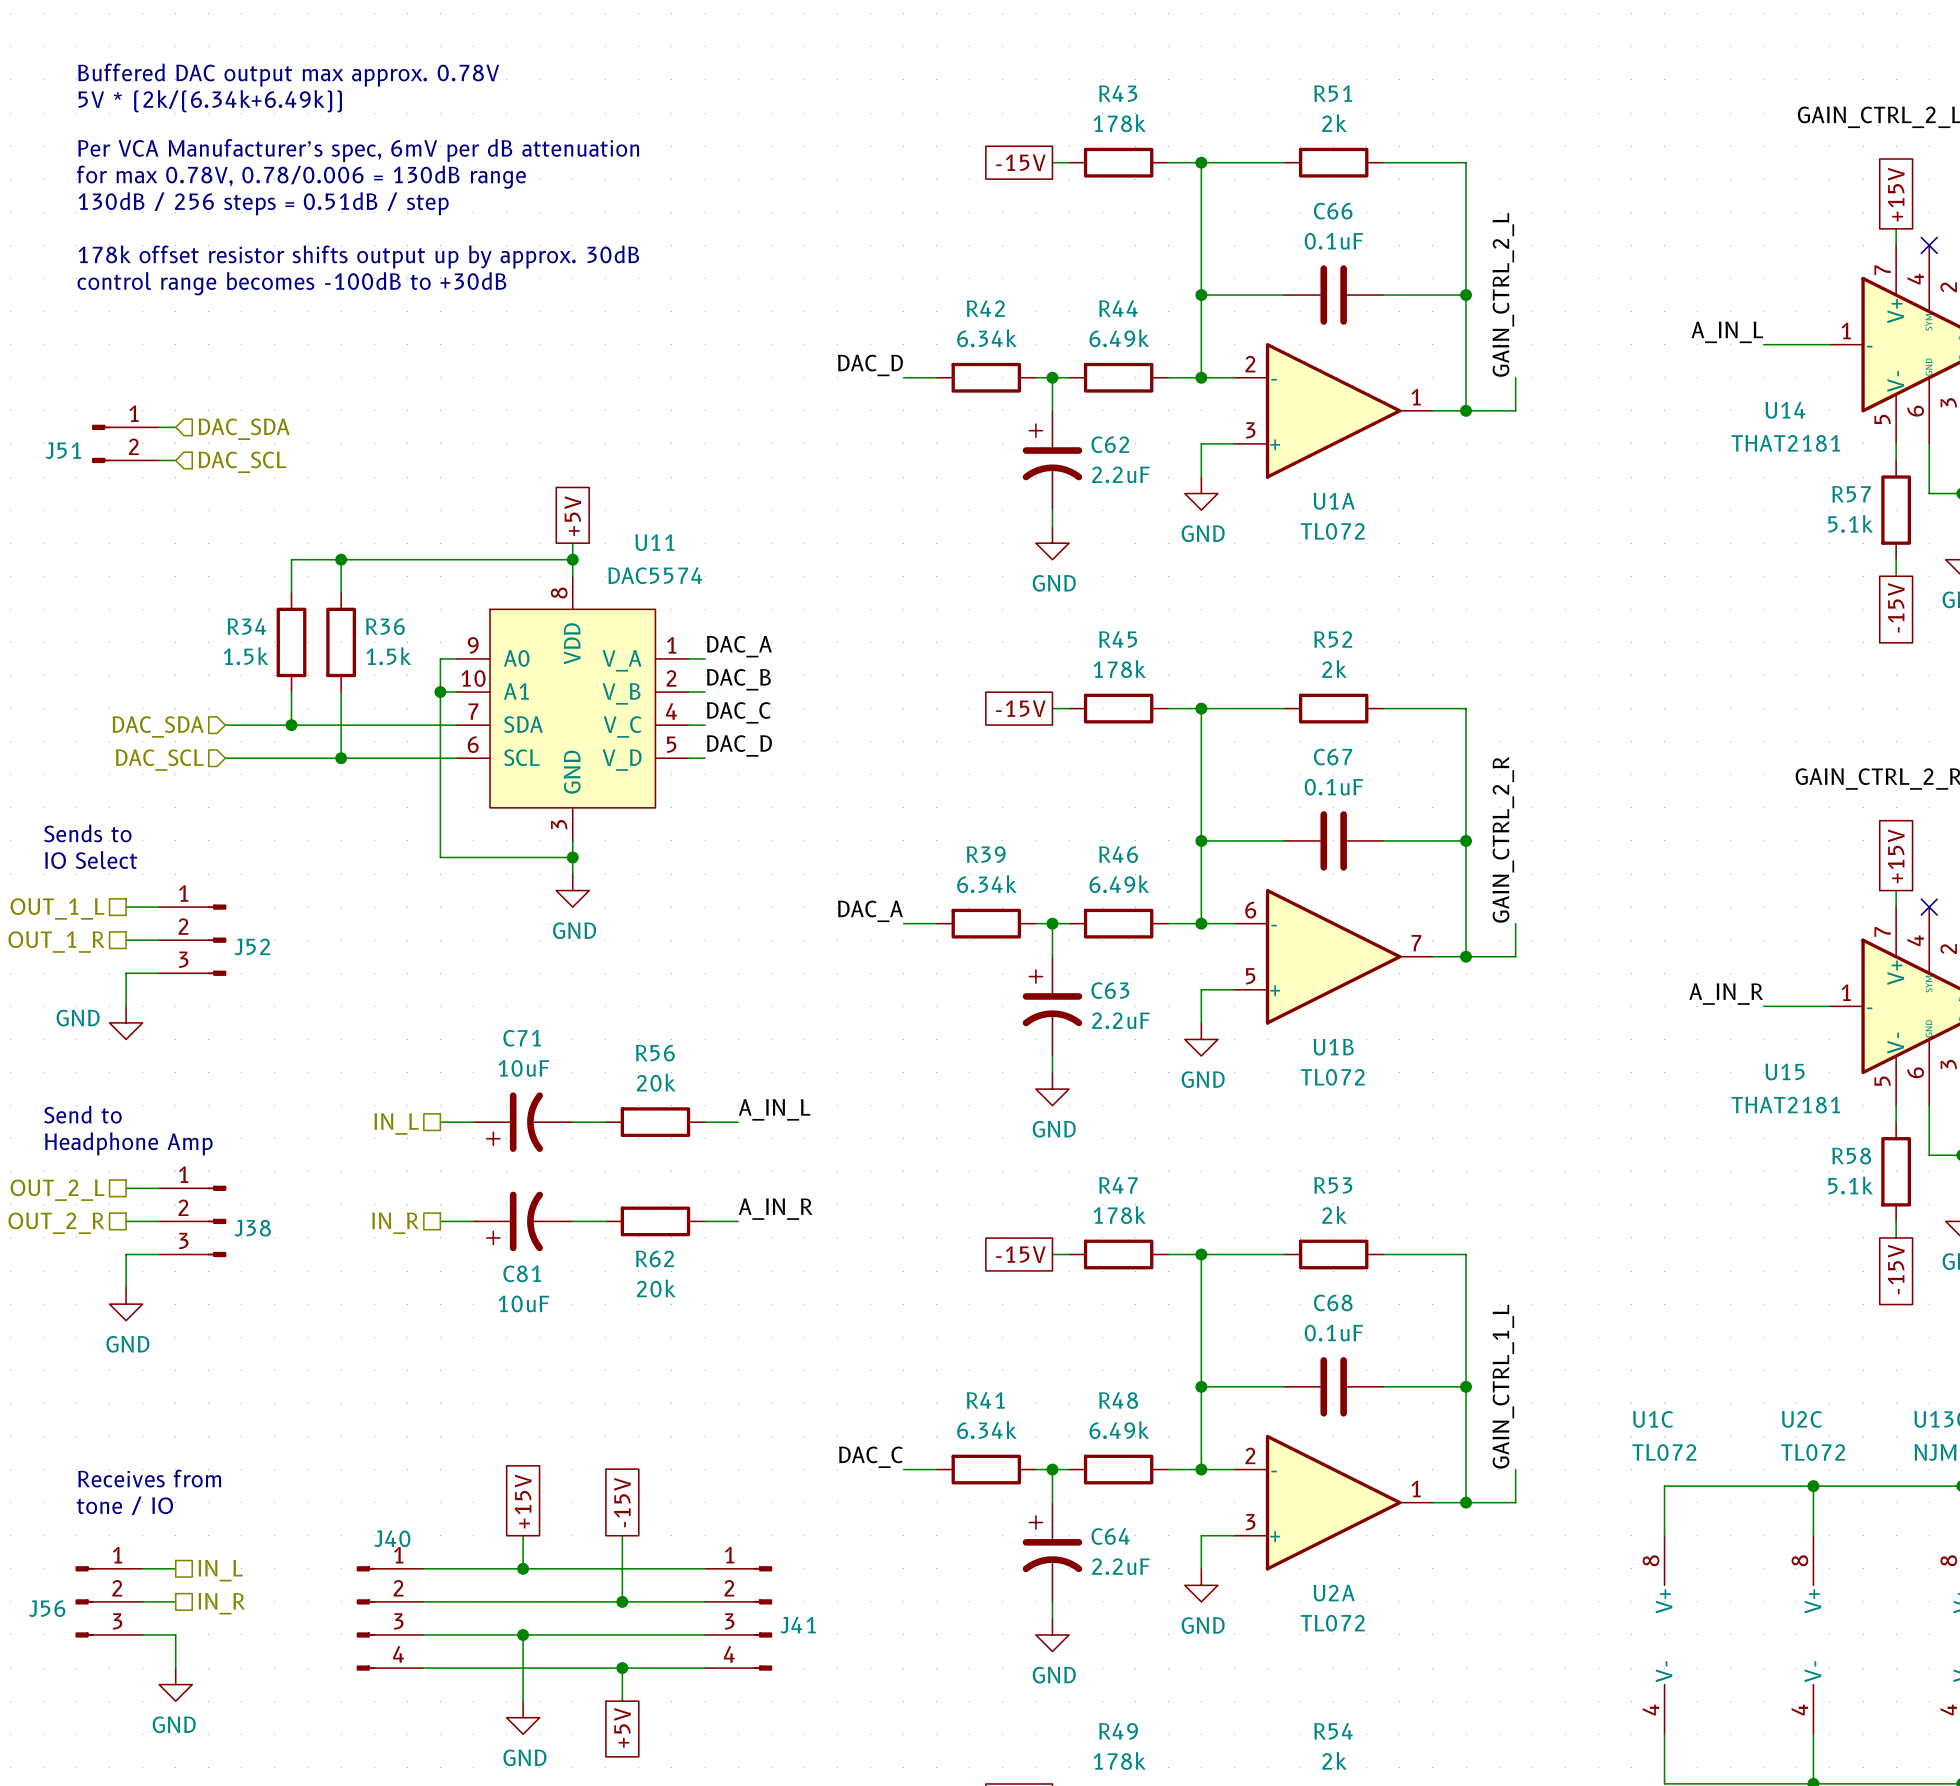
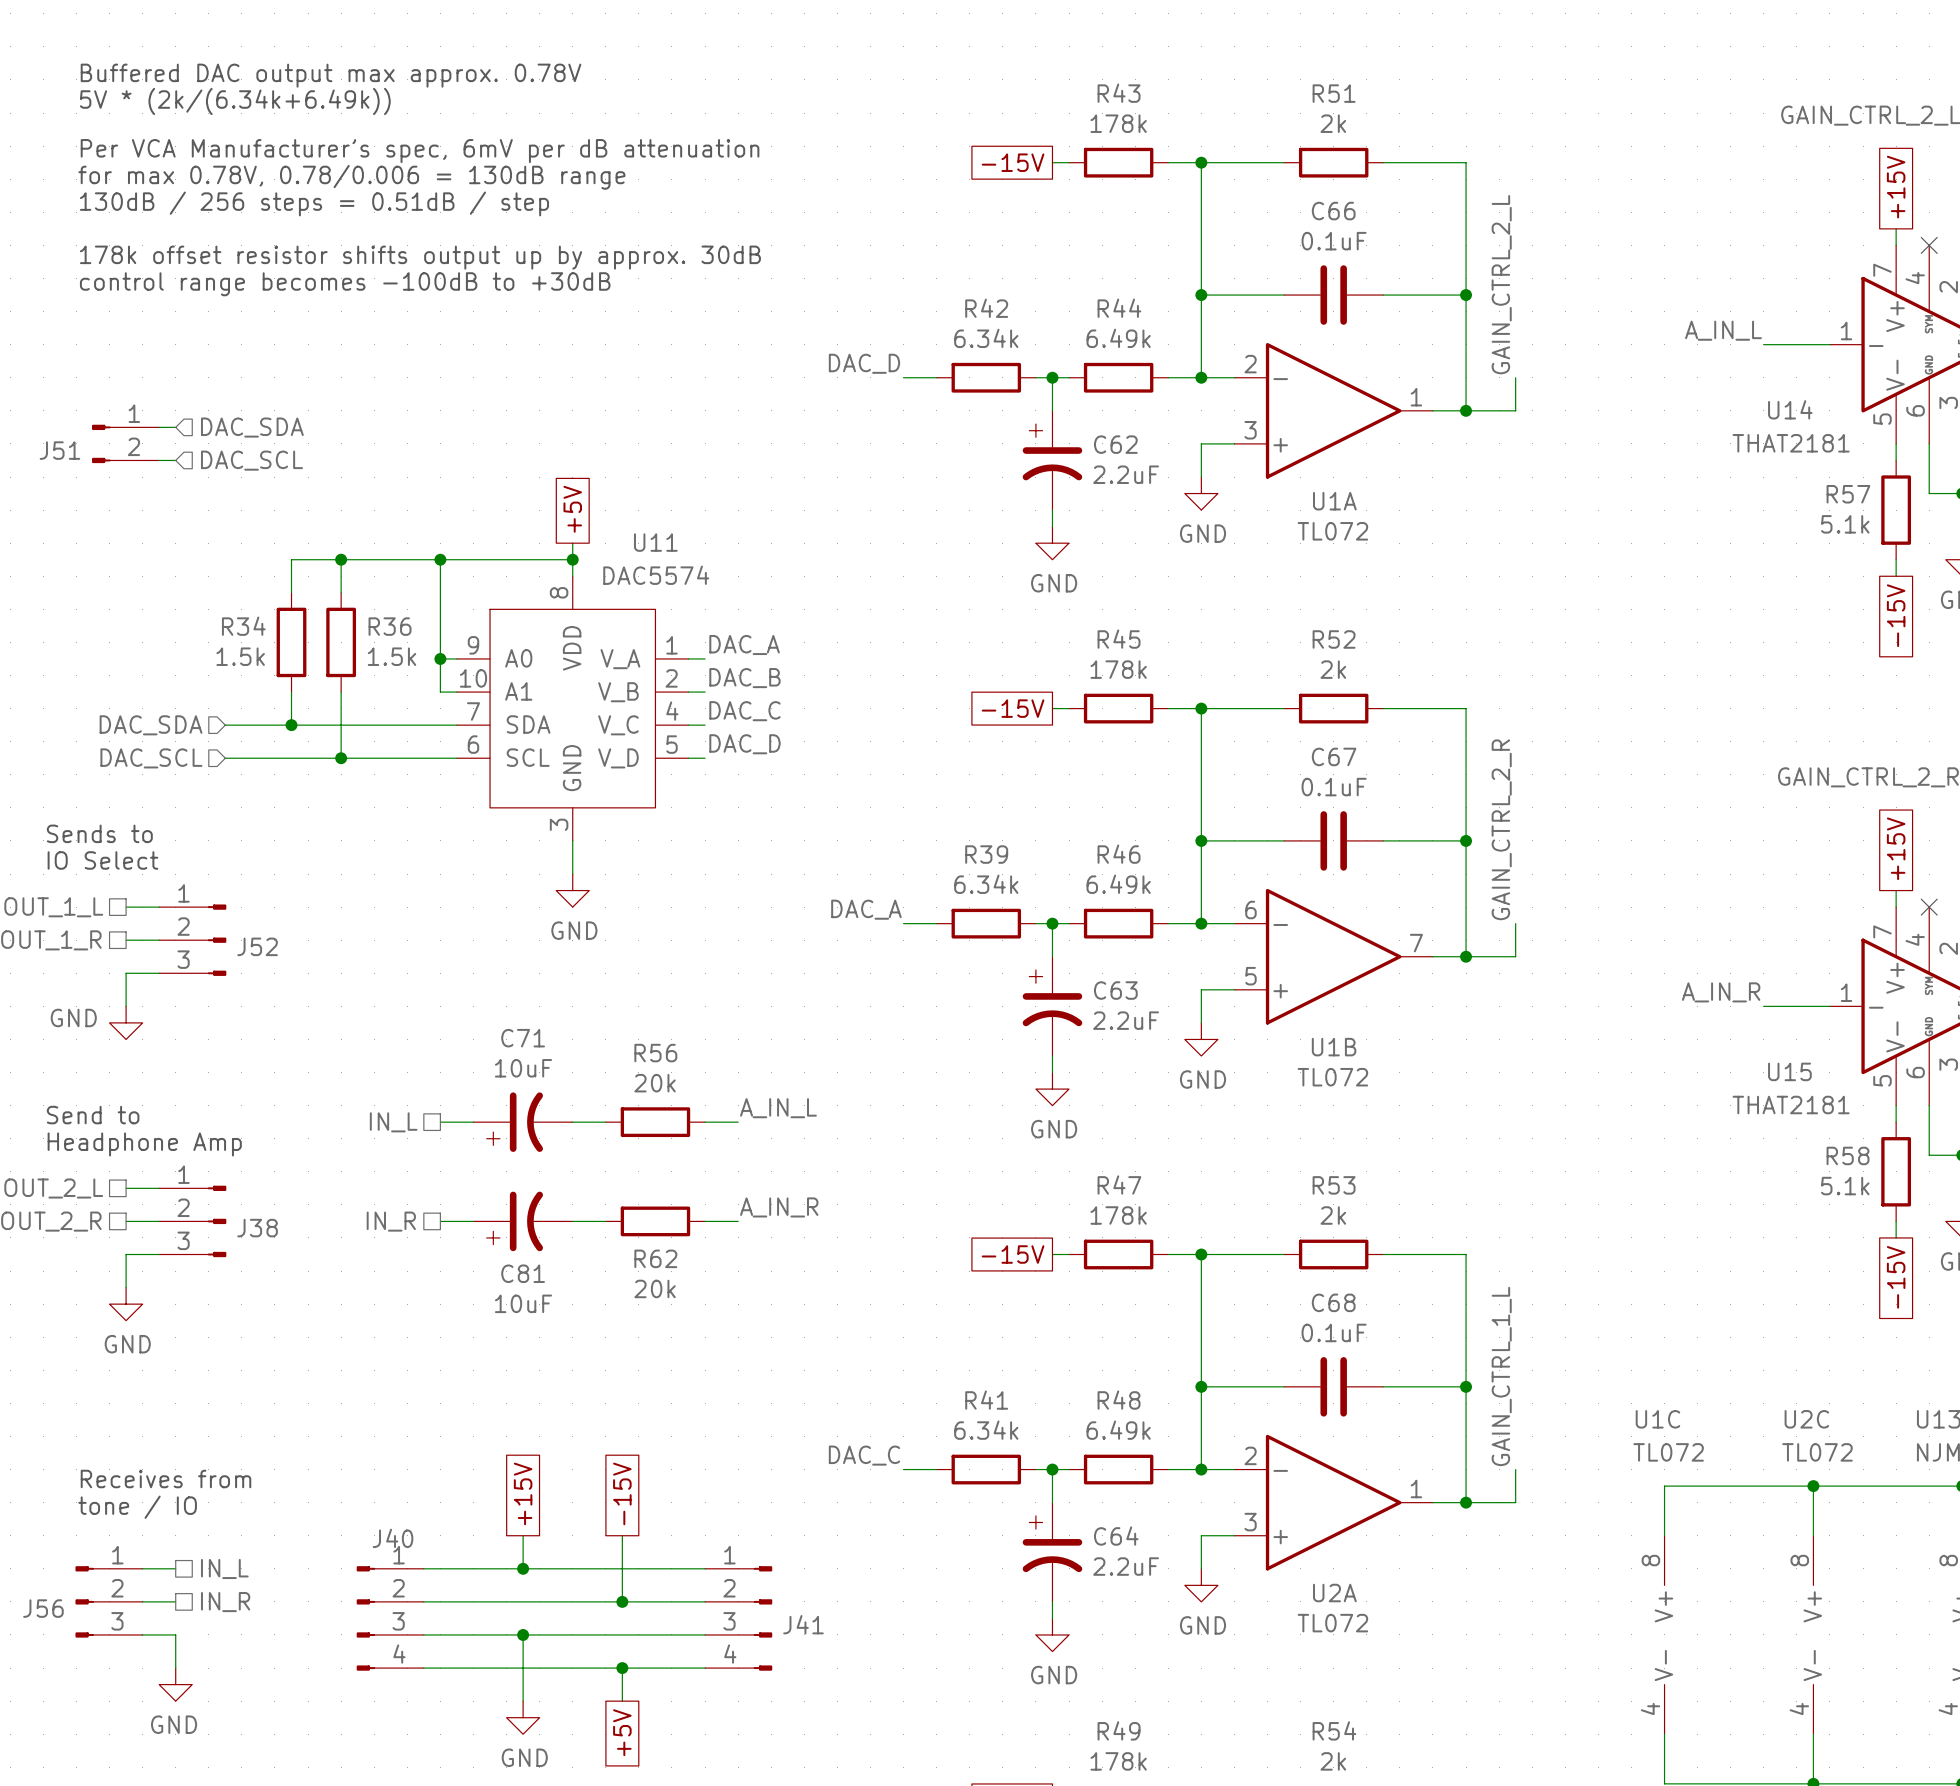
wire: none -> (440, 559) (440, 658)
junction: none -> (440, 559)
wire: (440, 692) (440, 857) (572, 857) -> none
junction position: (440, 692) -> (440, 658)
junction: (572, 857) -> none

